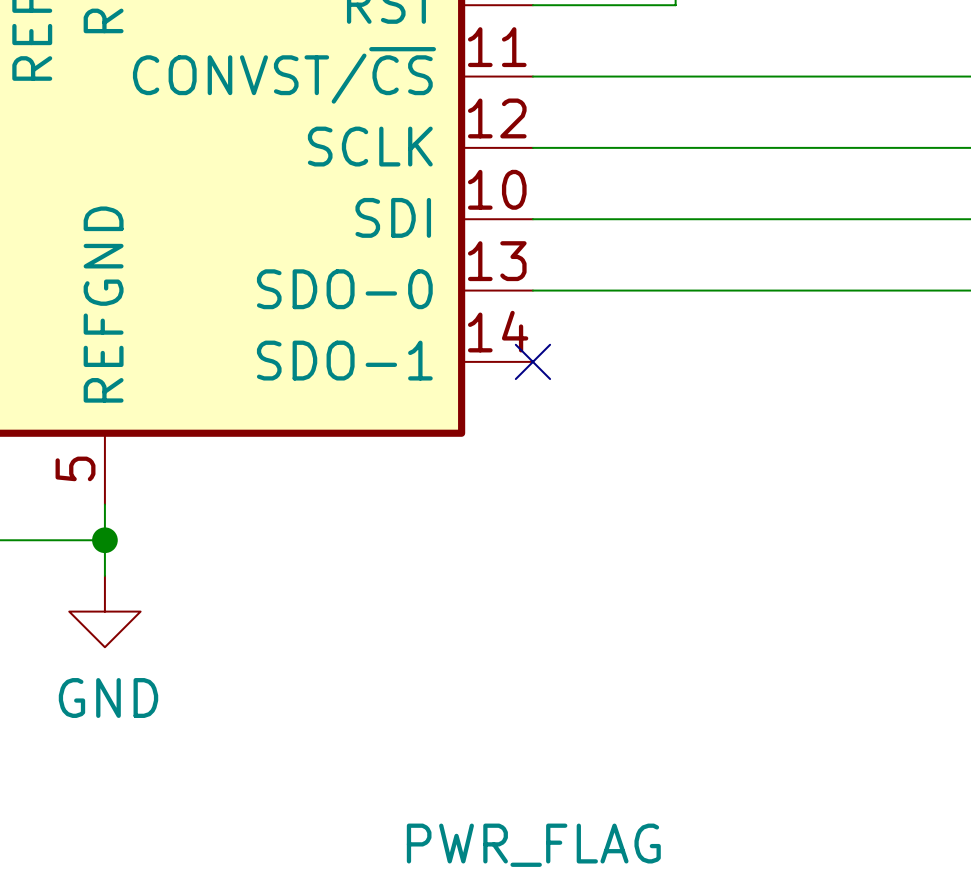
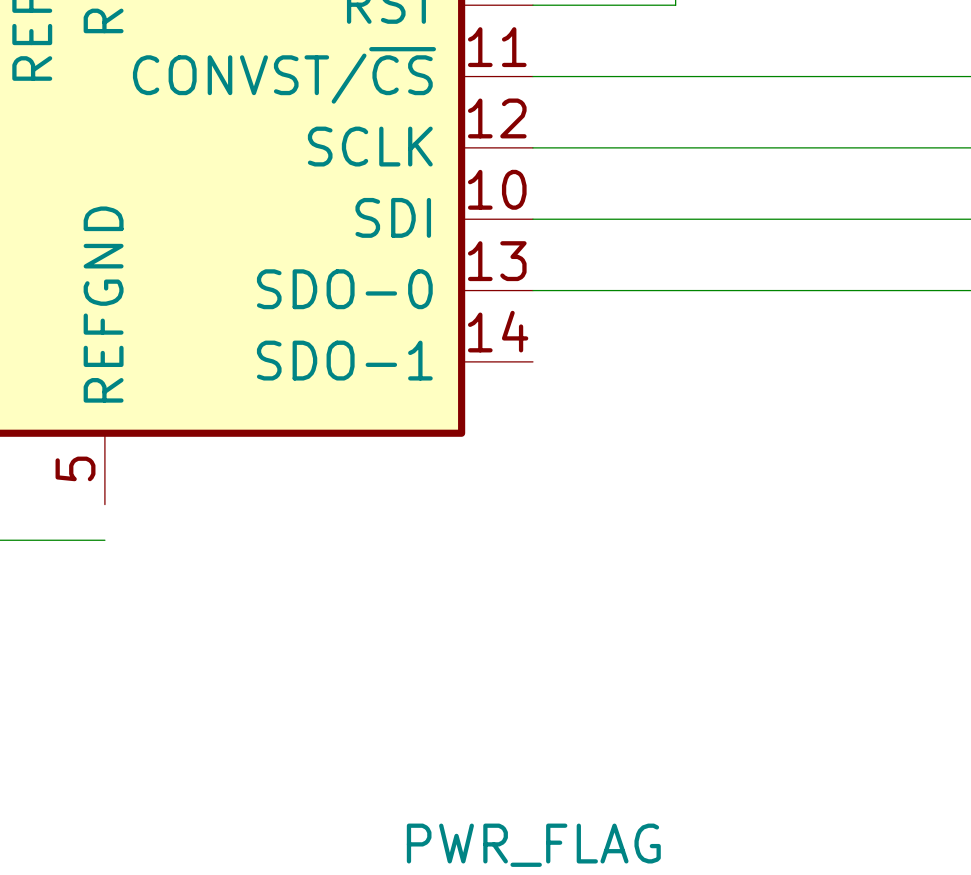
no-connect mark: (532, 361) -> none
wire: (104, 504) (104, 575) -> none
junction: (104, 540) -> none
power symbol: GND (104, 611) -> none

